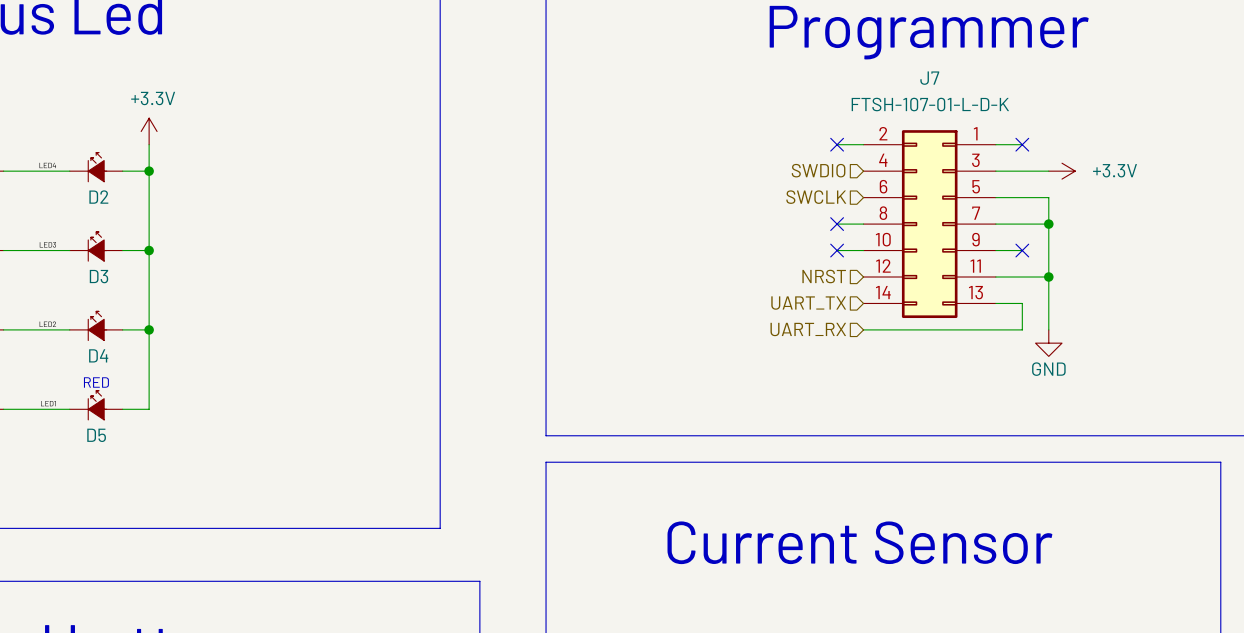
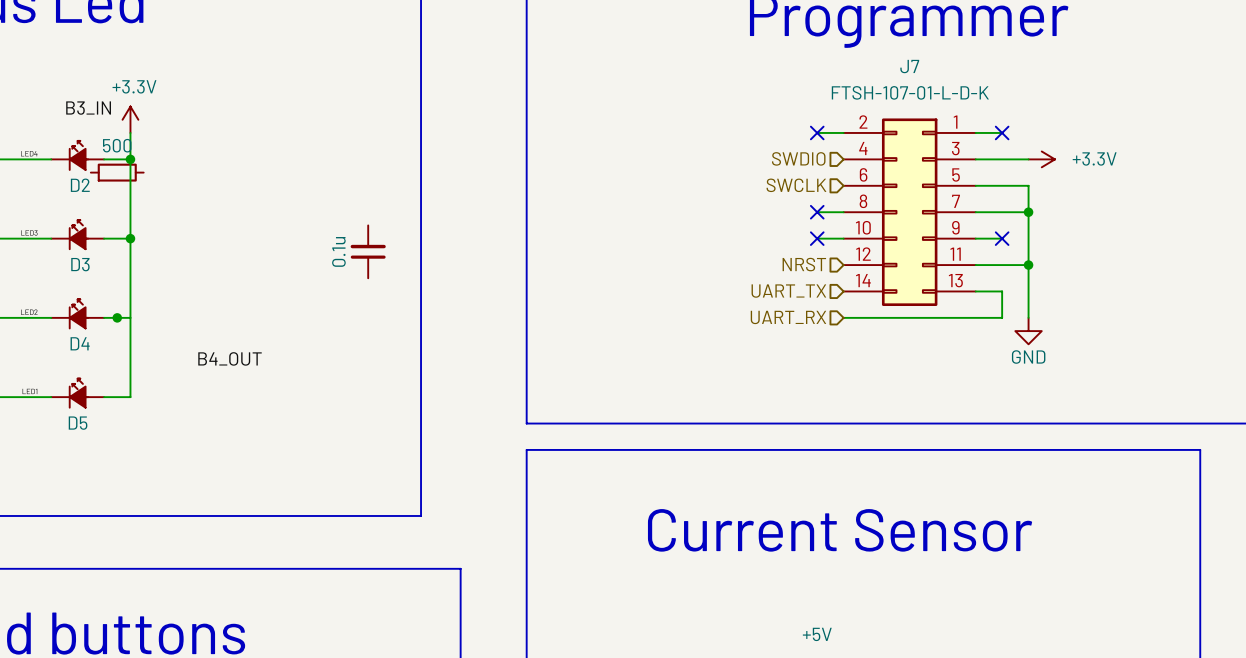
label: none -> B3_IN (88, 108)
part: none -> 500 (117, 172)
part: none -> 0.1u (368, 251)
junction position: (149, 329) -> (117, 317)
label: none -> B4_OUT (230, 358)
text: RED (96, 382) -> none

